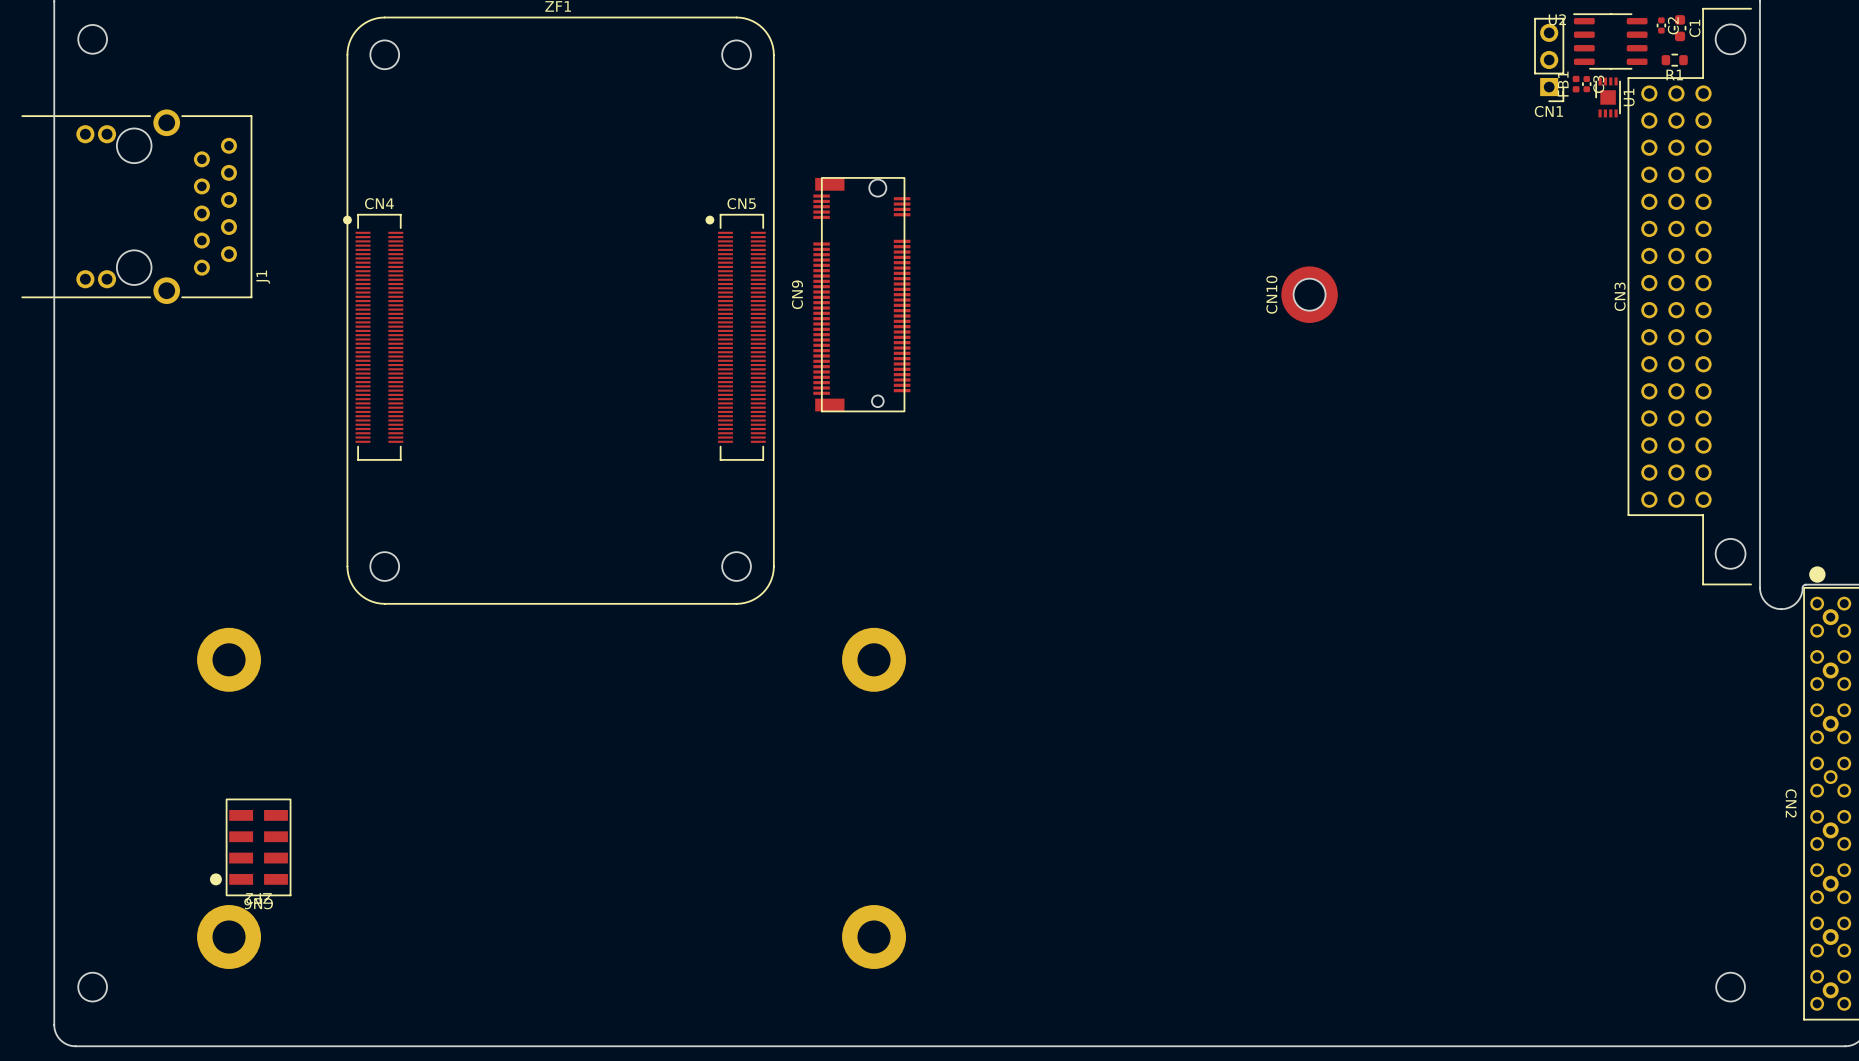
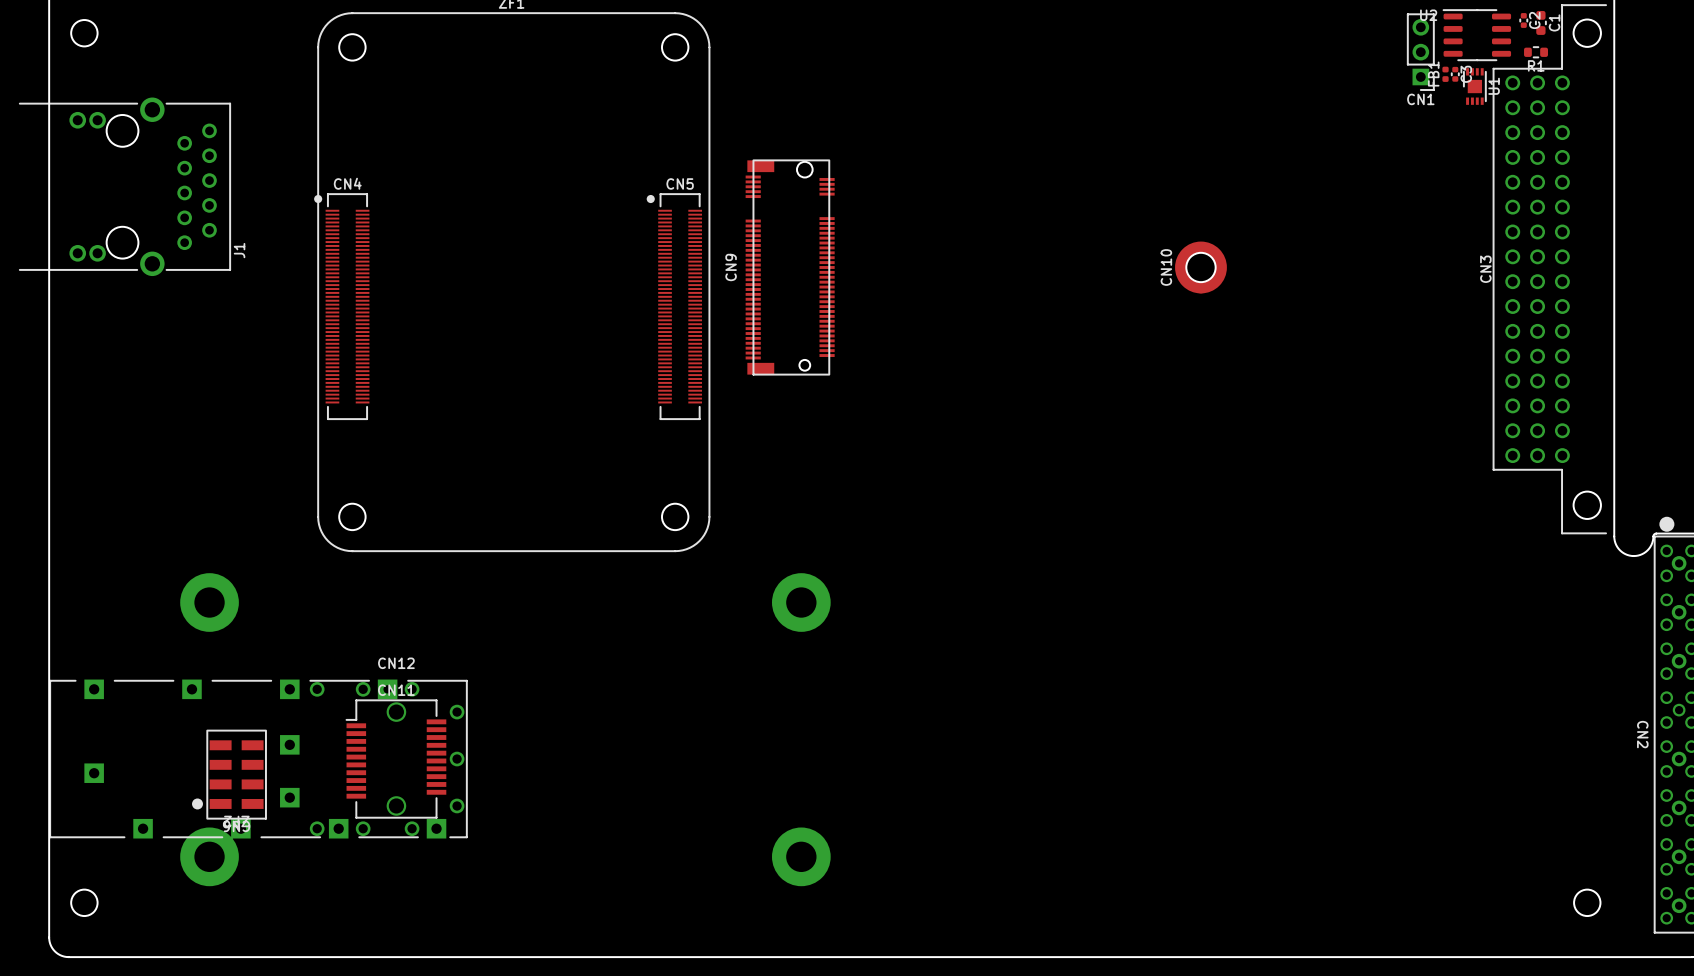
CN12: none -> (258, 759)
CN11: none -> (396, 759)

